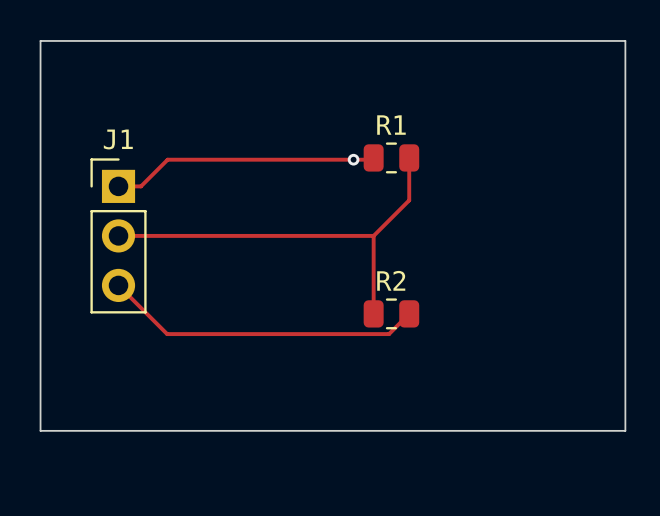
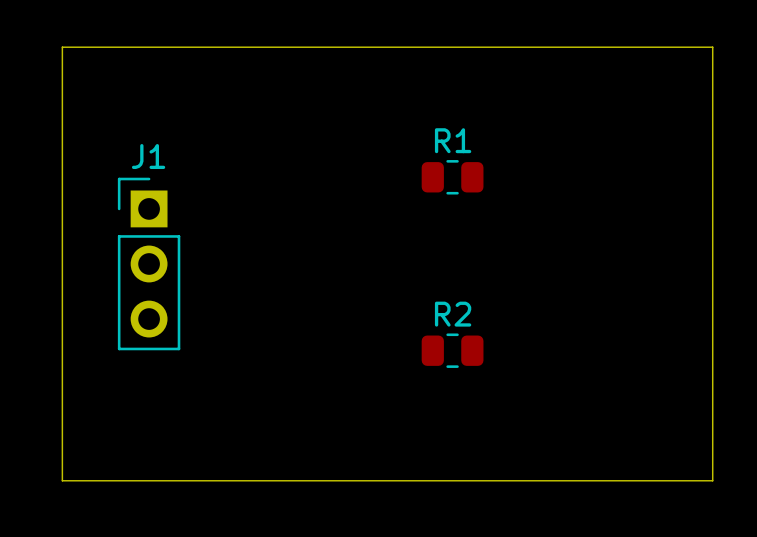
track: (373, 157) (371, 159) (167, 159) (140, 186) (118, 186) -> none
track: (409, 157) (409, 200) (373, 235) -> none
via: (353, 159) -> none
track: (118, 235) (373, 235) -> none
track: (373, 235) (373, 313) -> none
track: (118, 285) (167, 334) (389, 334) (409, 313) -> none

